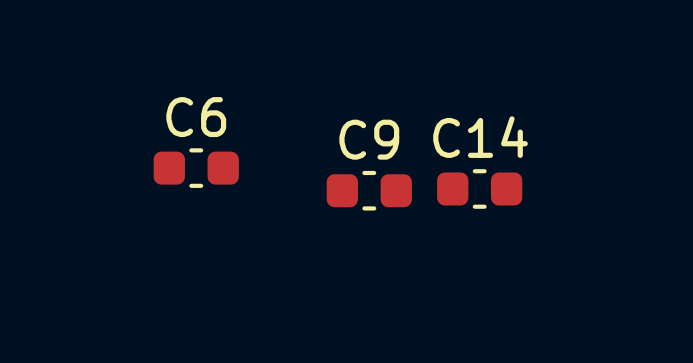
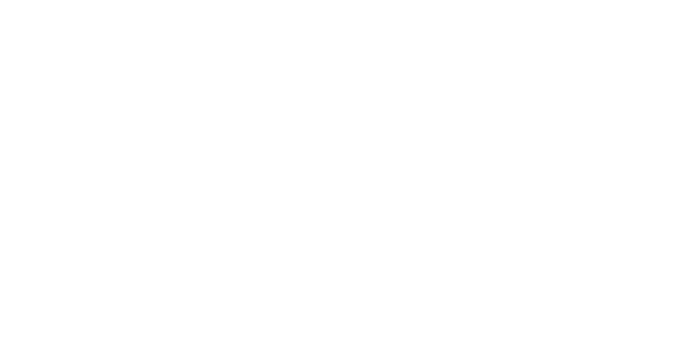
C6: (196, 168) -> none
C14: (479, 188) -> none
C9: (369, 190) -> none

